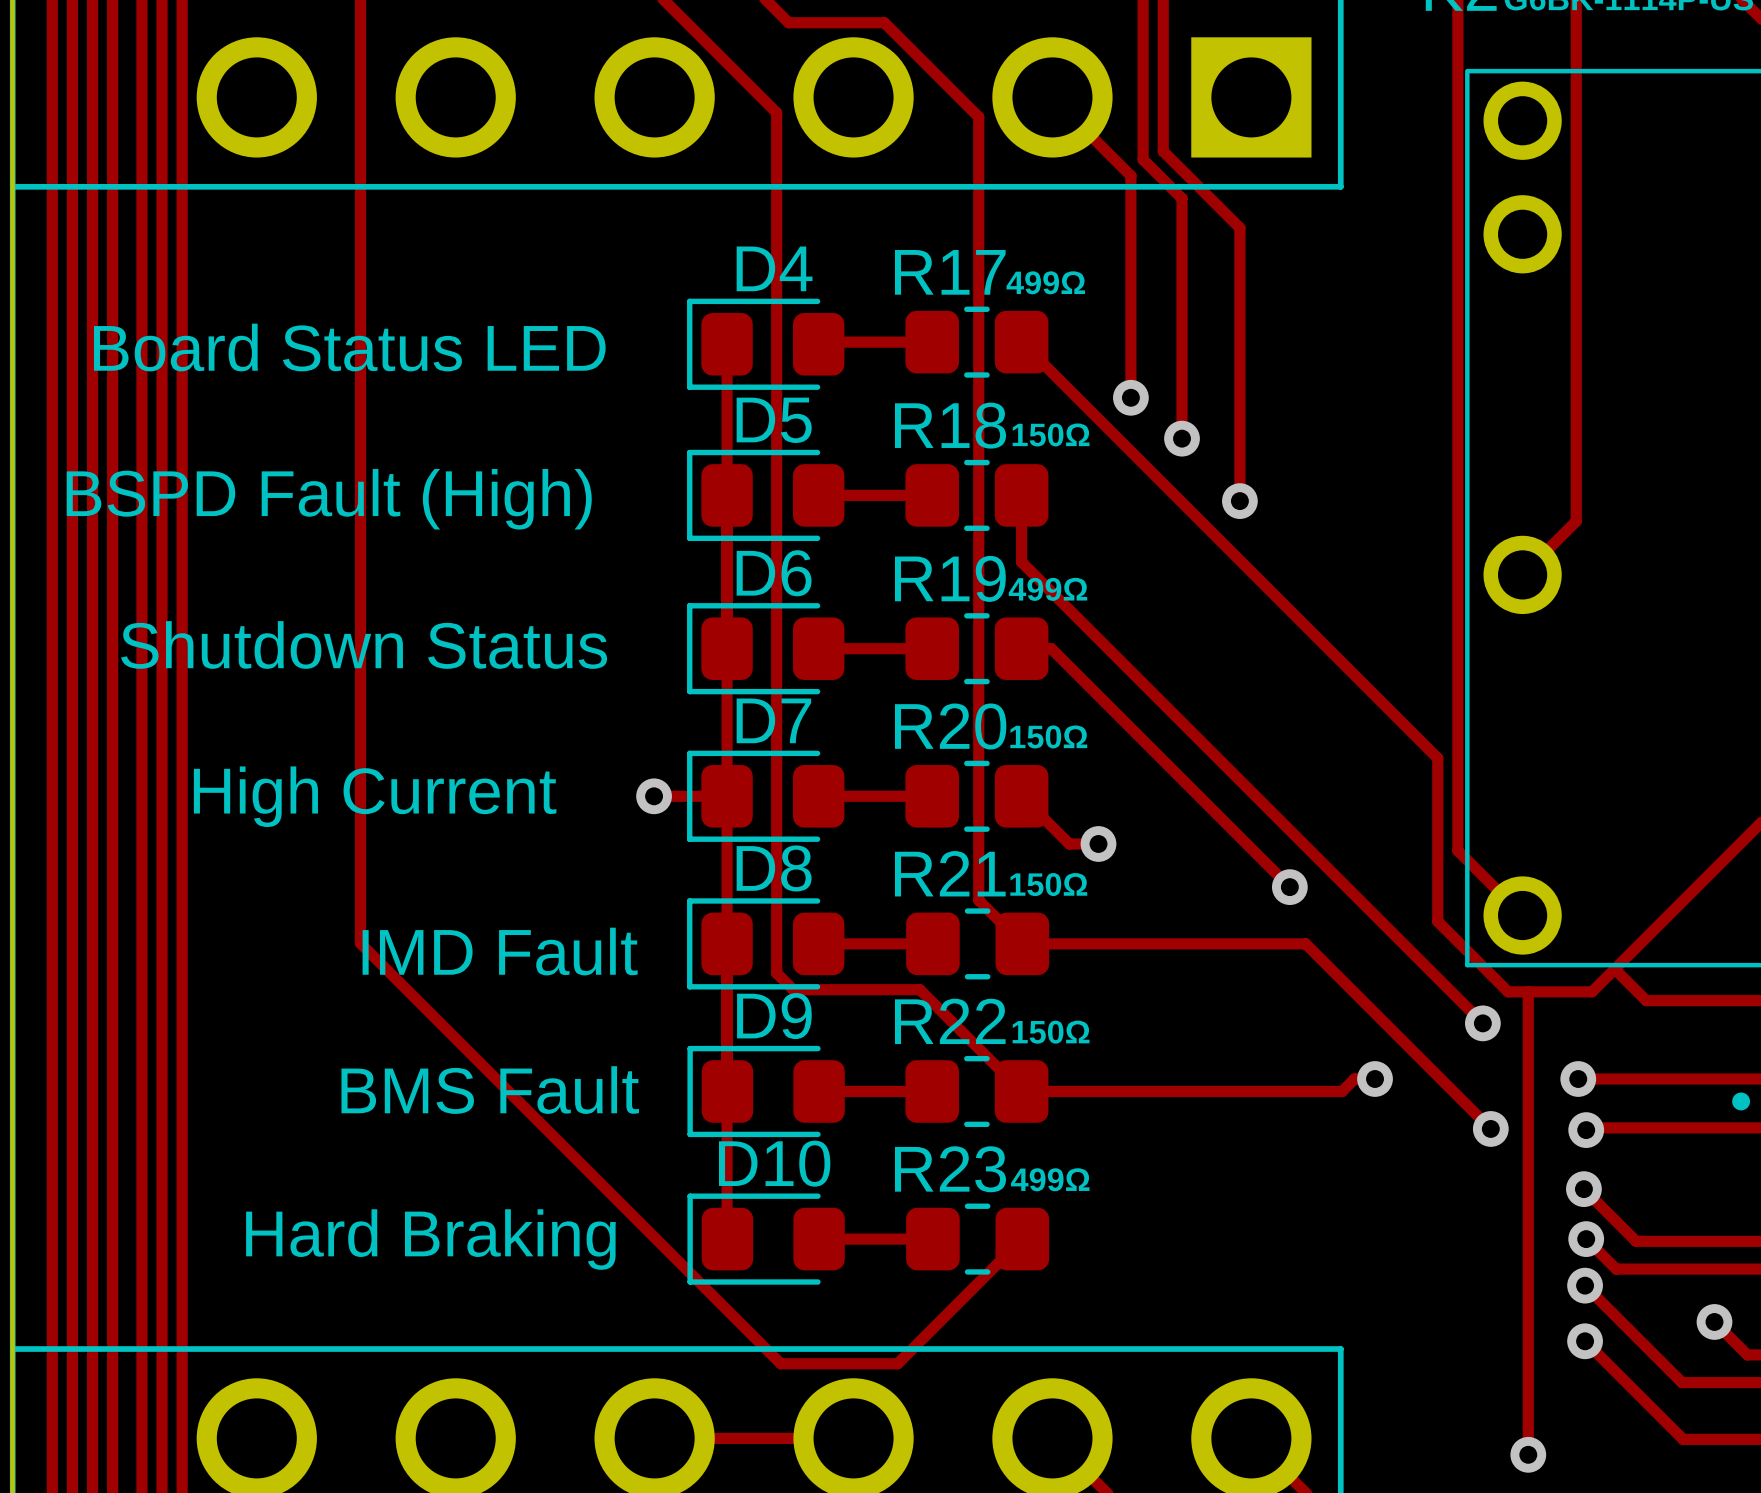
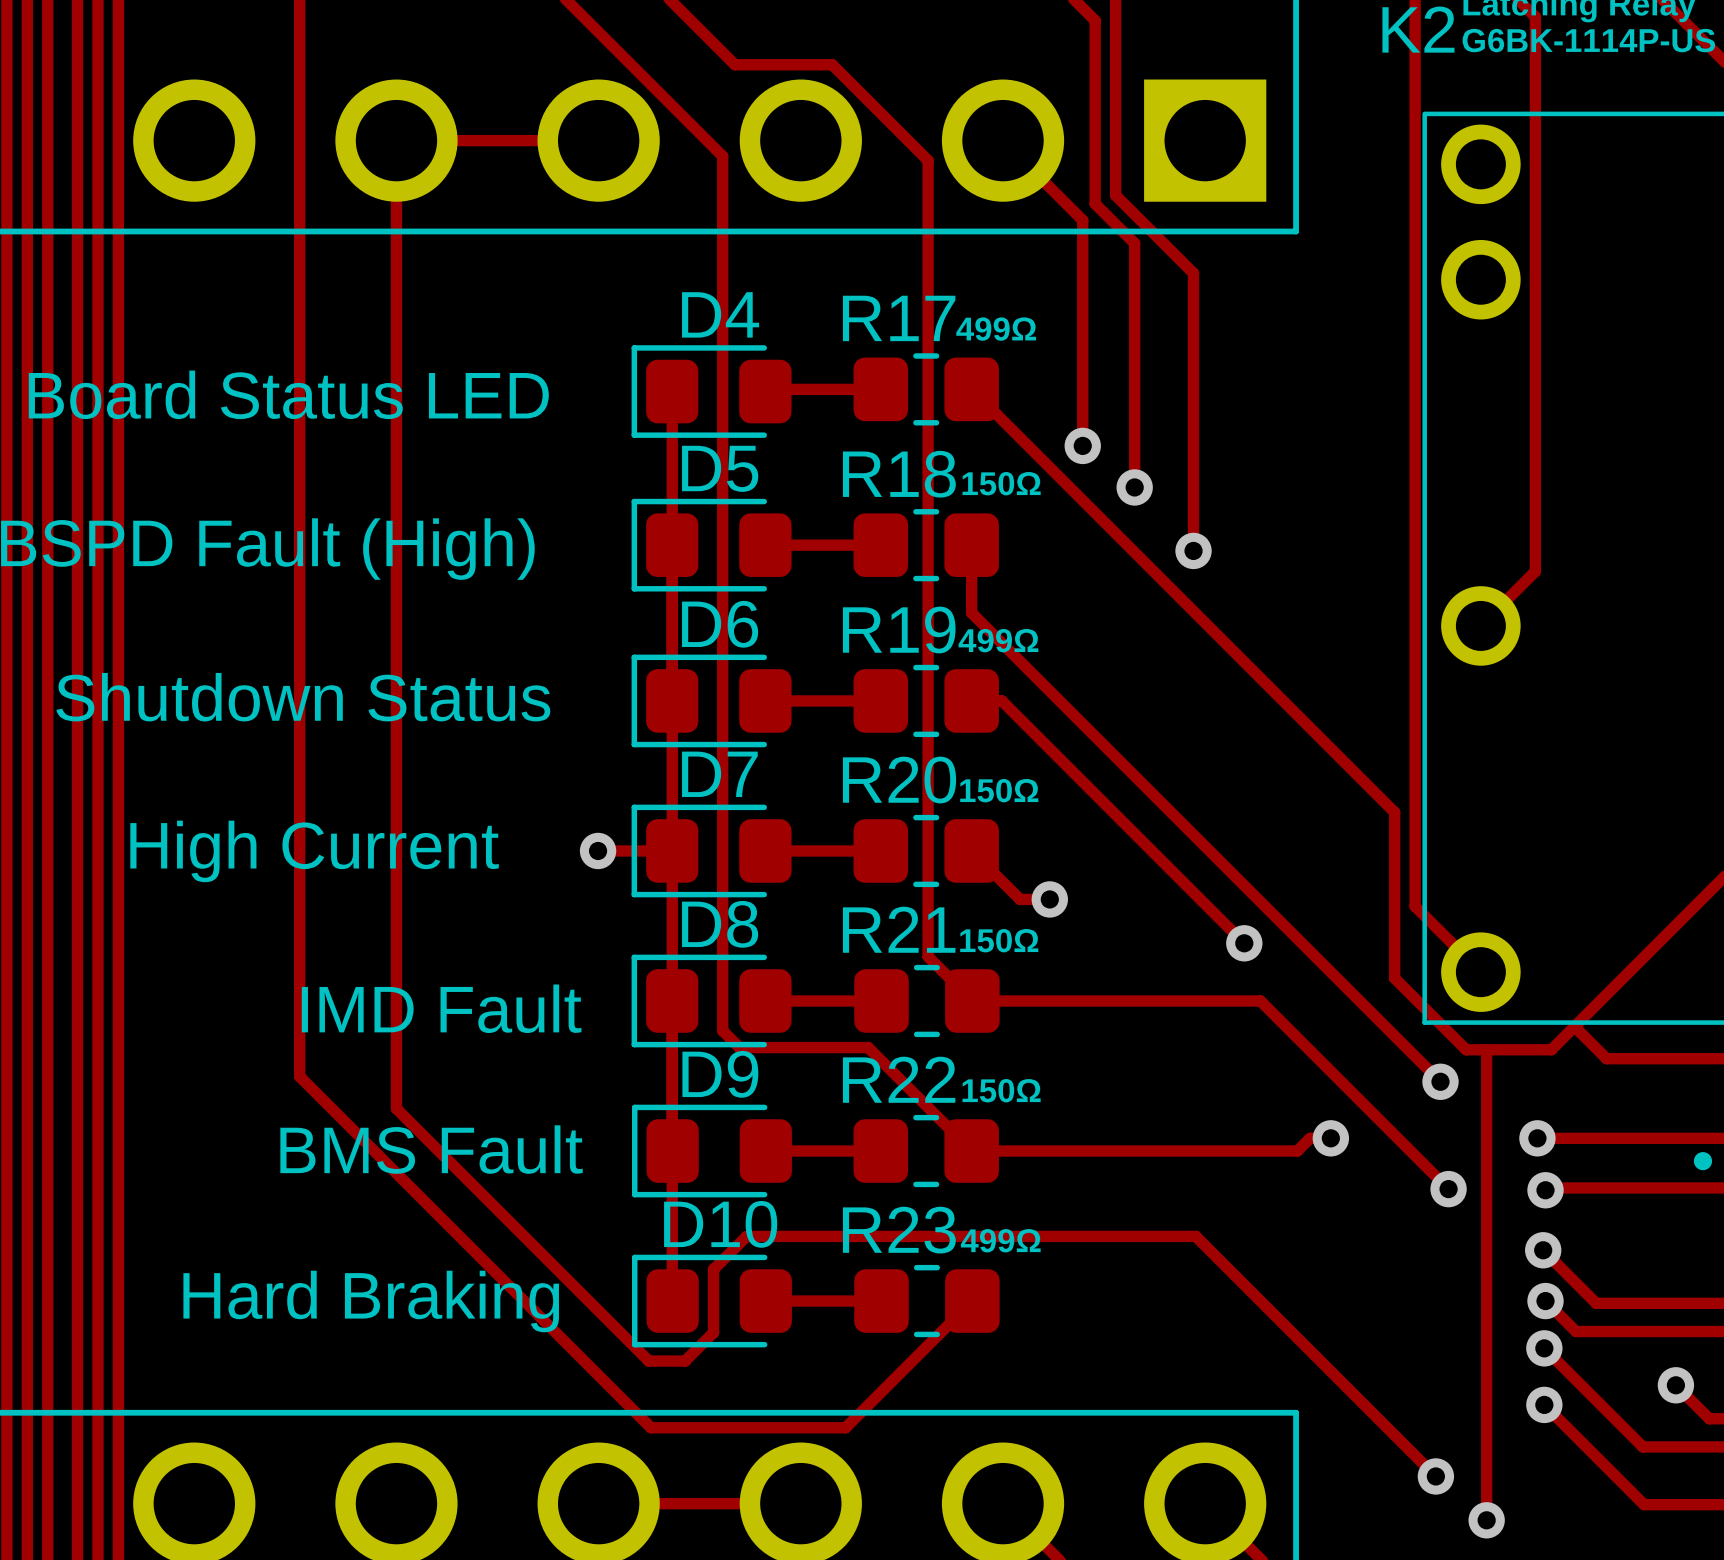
track: none -> (598, 140) (396, 140) (396, 1108) (648, 1361) (685, 1361) (713, 1332) (713, 1269) (746, 1236) (1195, 1236) (1435, 1476)
track: (360, 943) (780, 1363) -> (299, 1000) (299, 1076) (650, 1427) (726, 1427)
via: none -> (1435, 1476)

